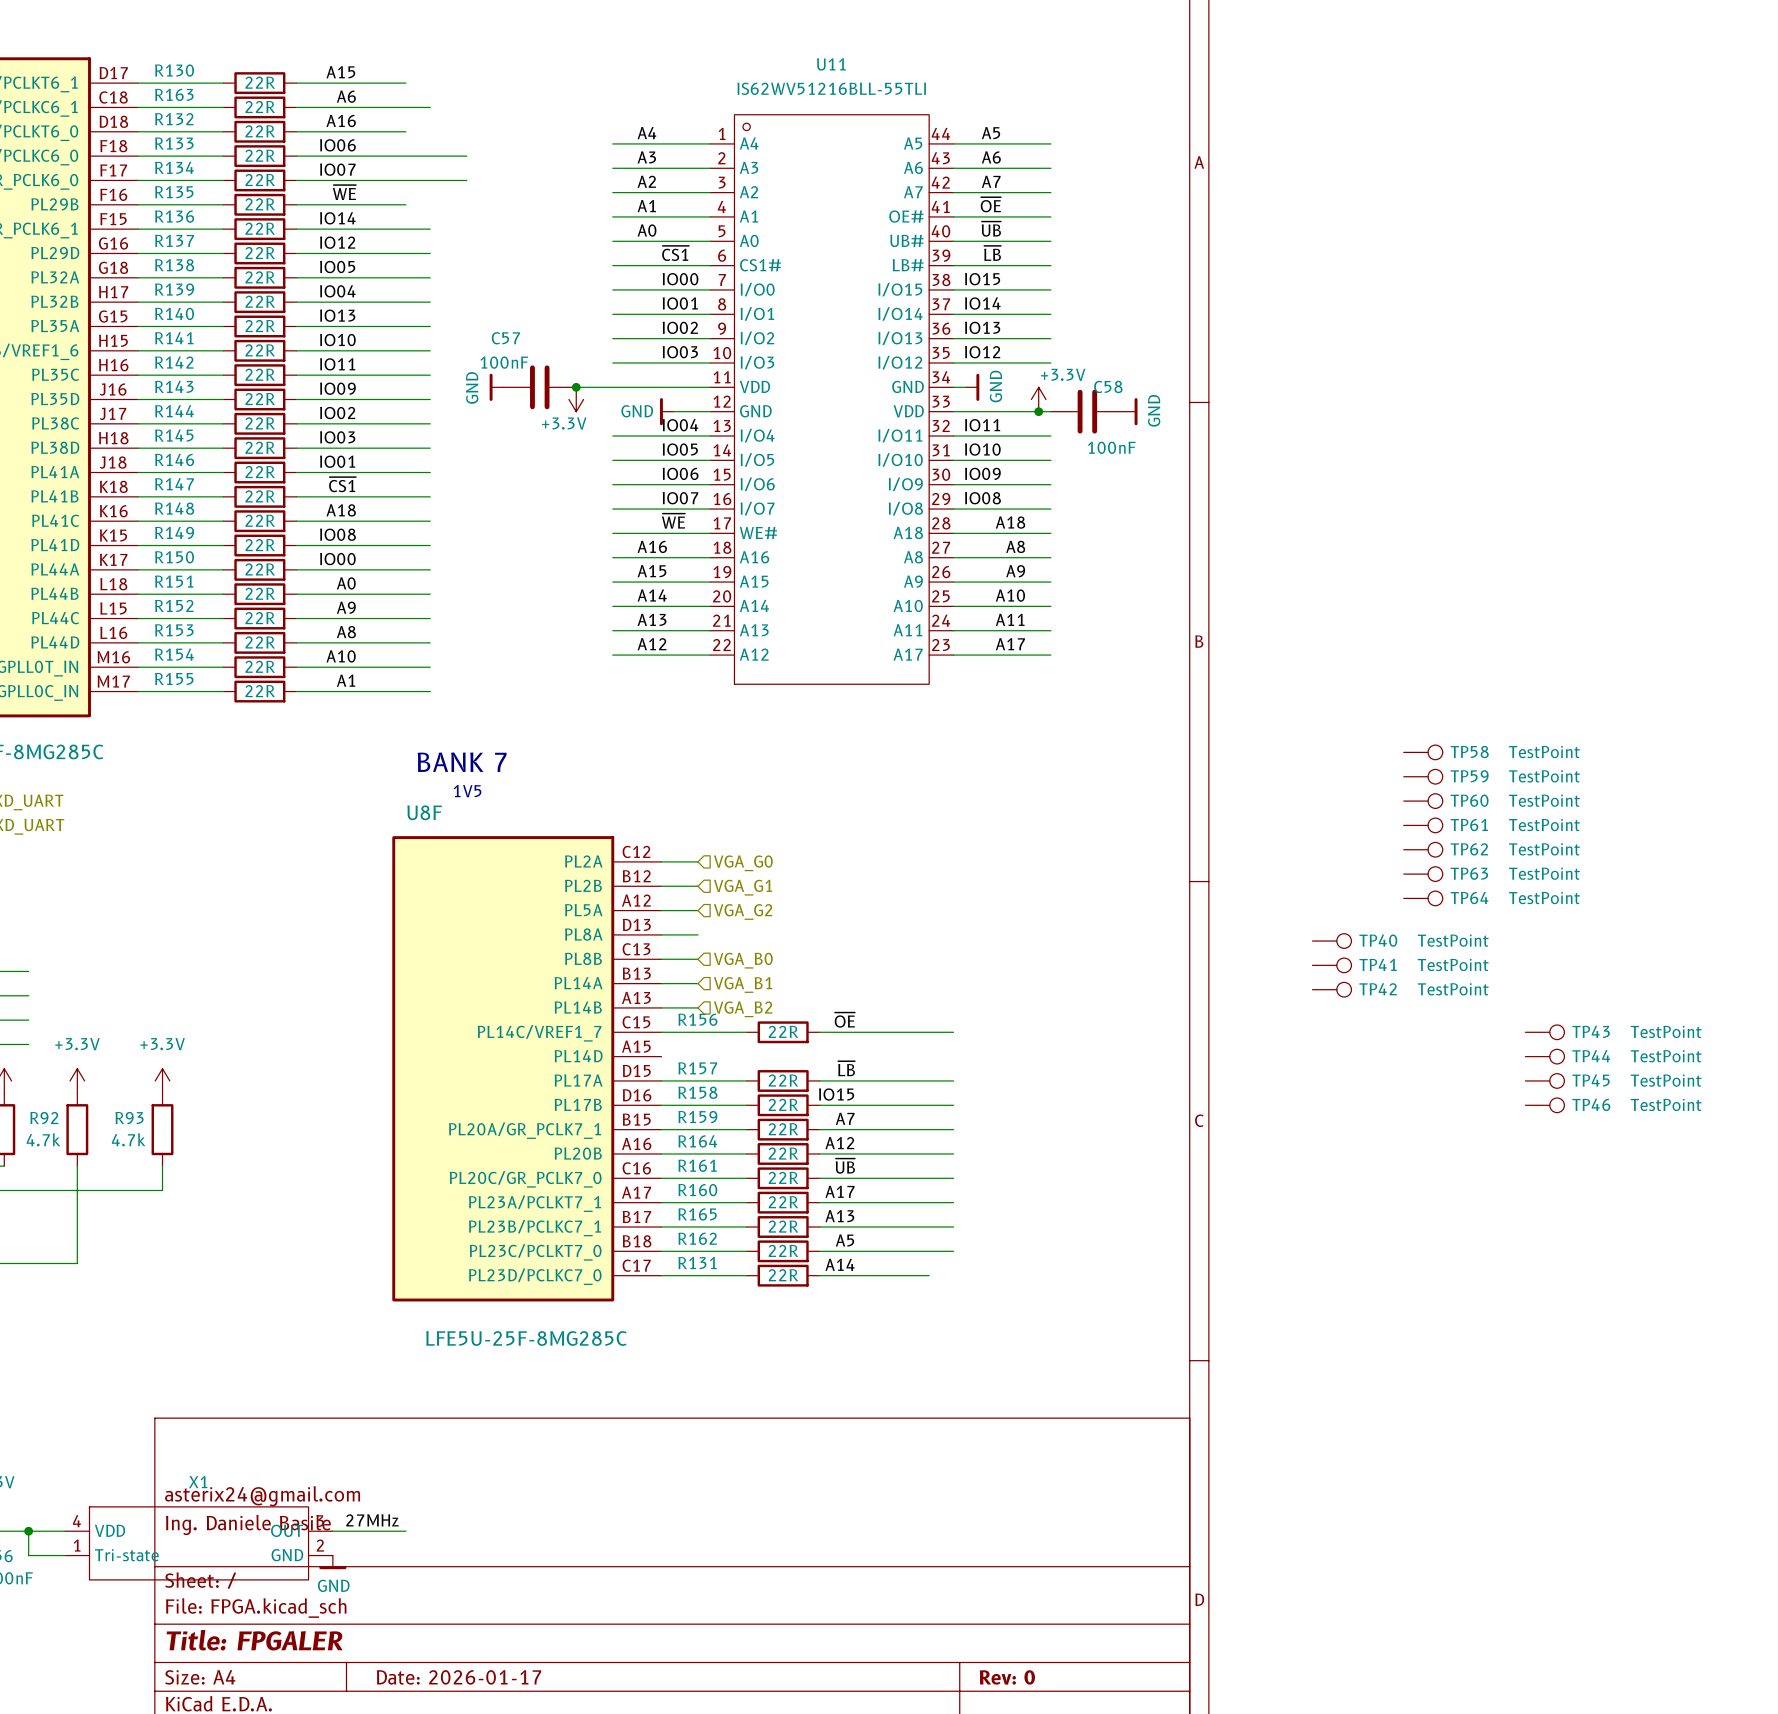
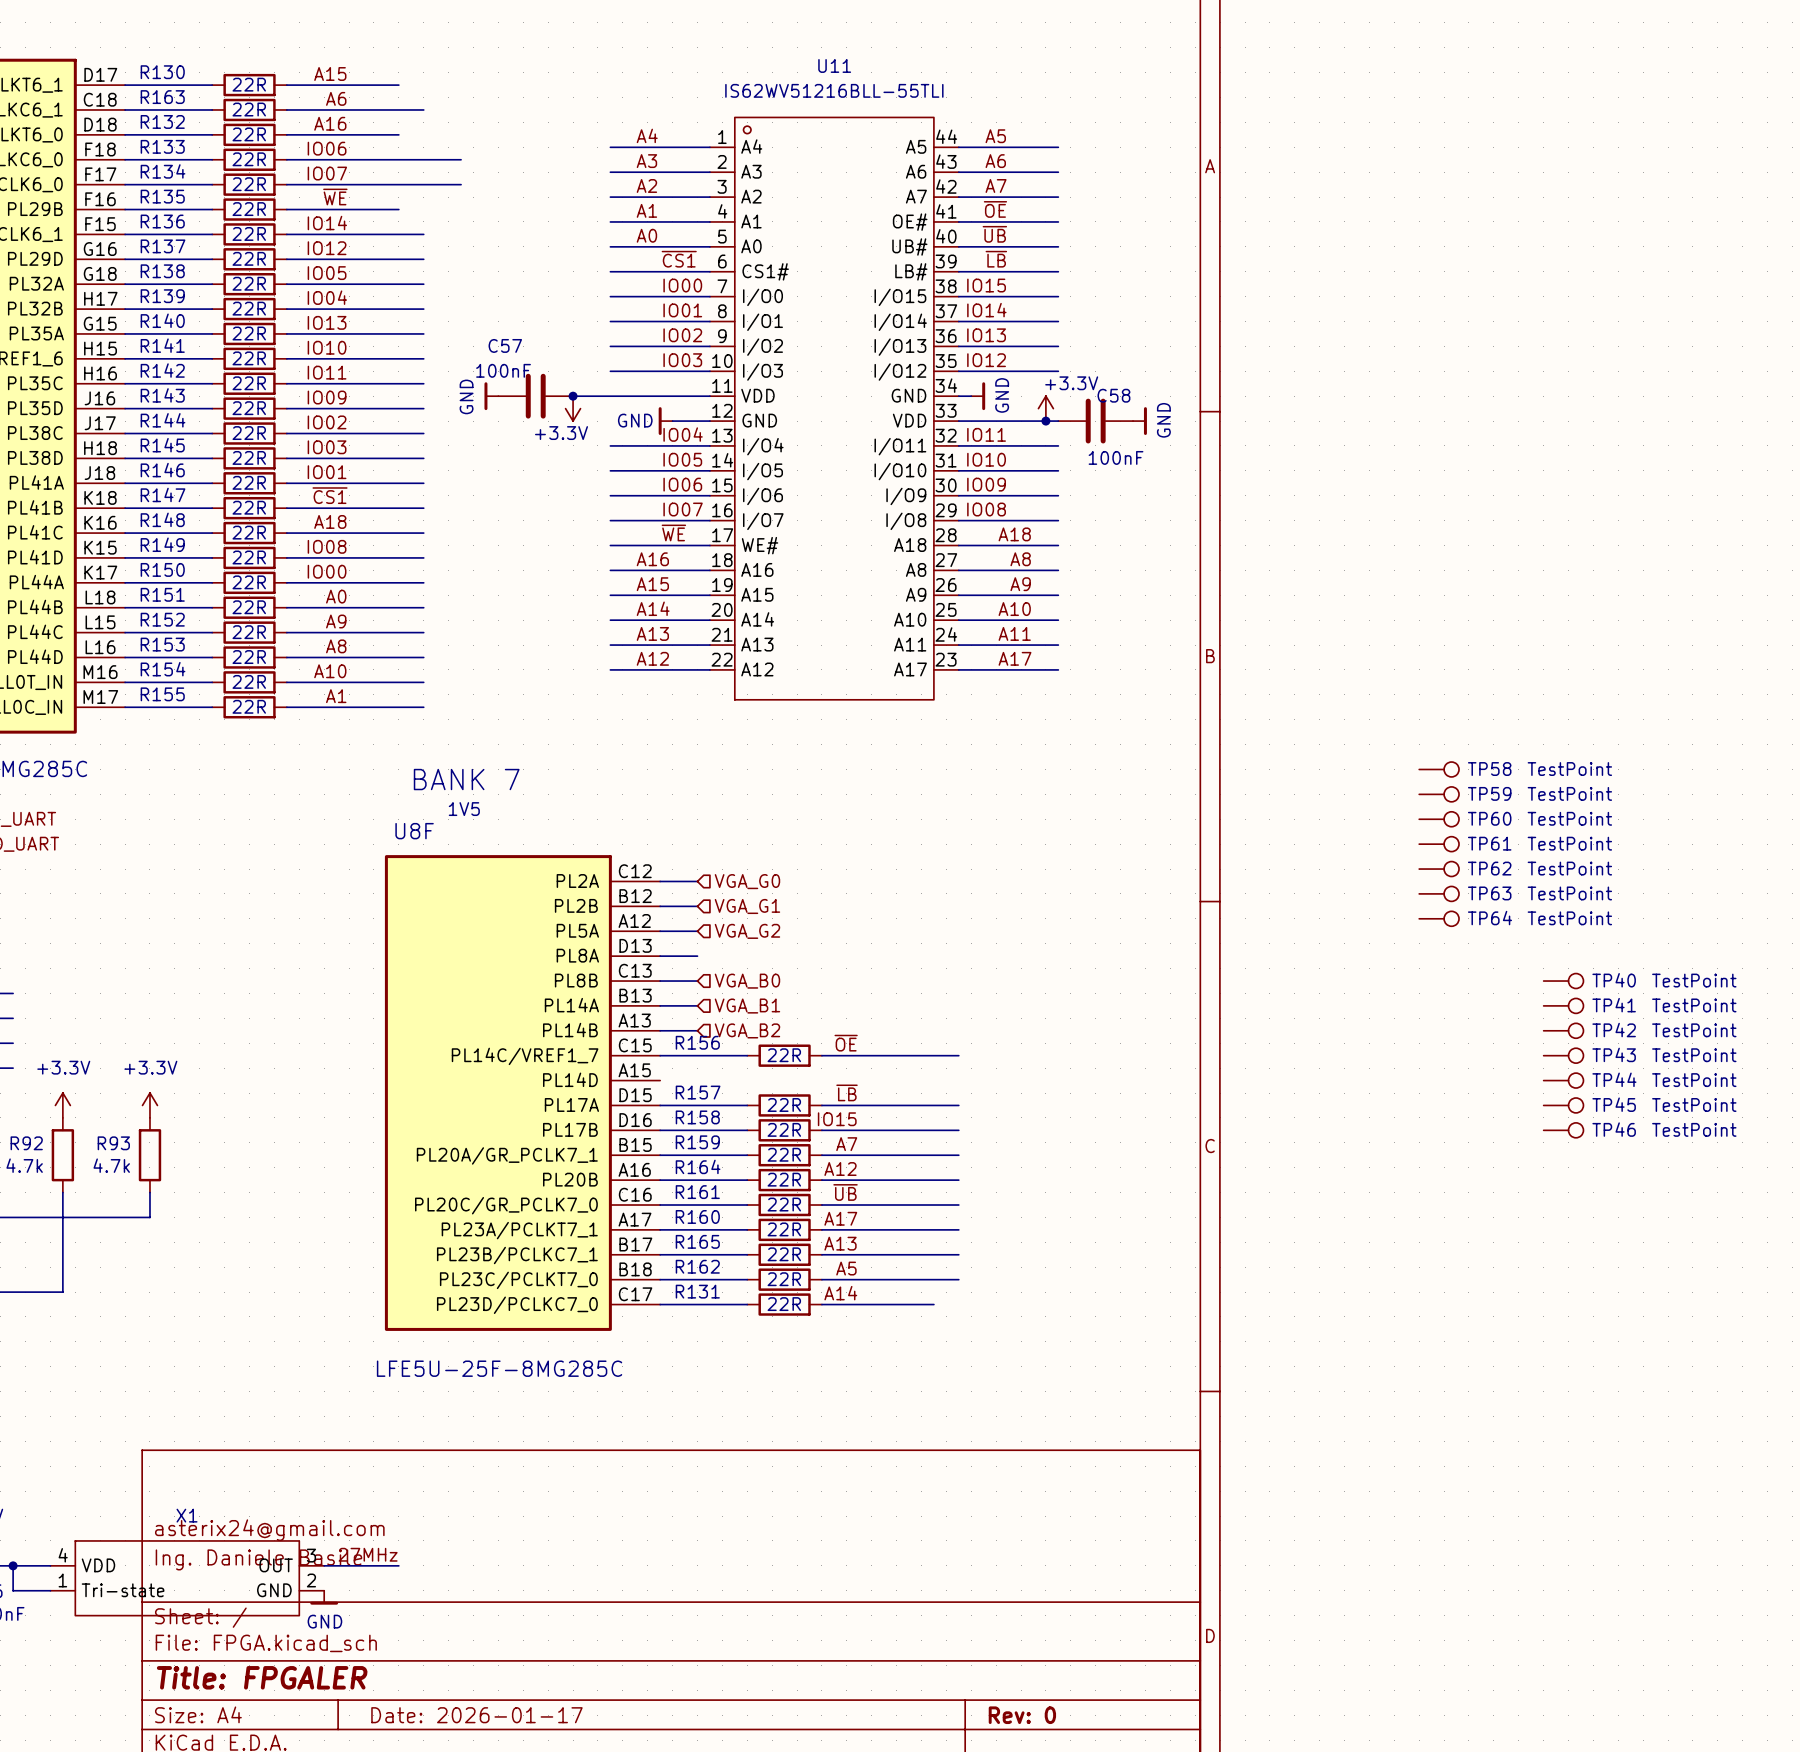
TP40 position: (1331, 941) -> (1563, 981)
TP41 position: (1331, 965) -> (1563, 1005)
TP42 position: (1331, 989) -> (1563, 1030)

